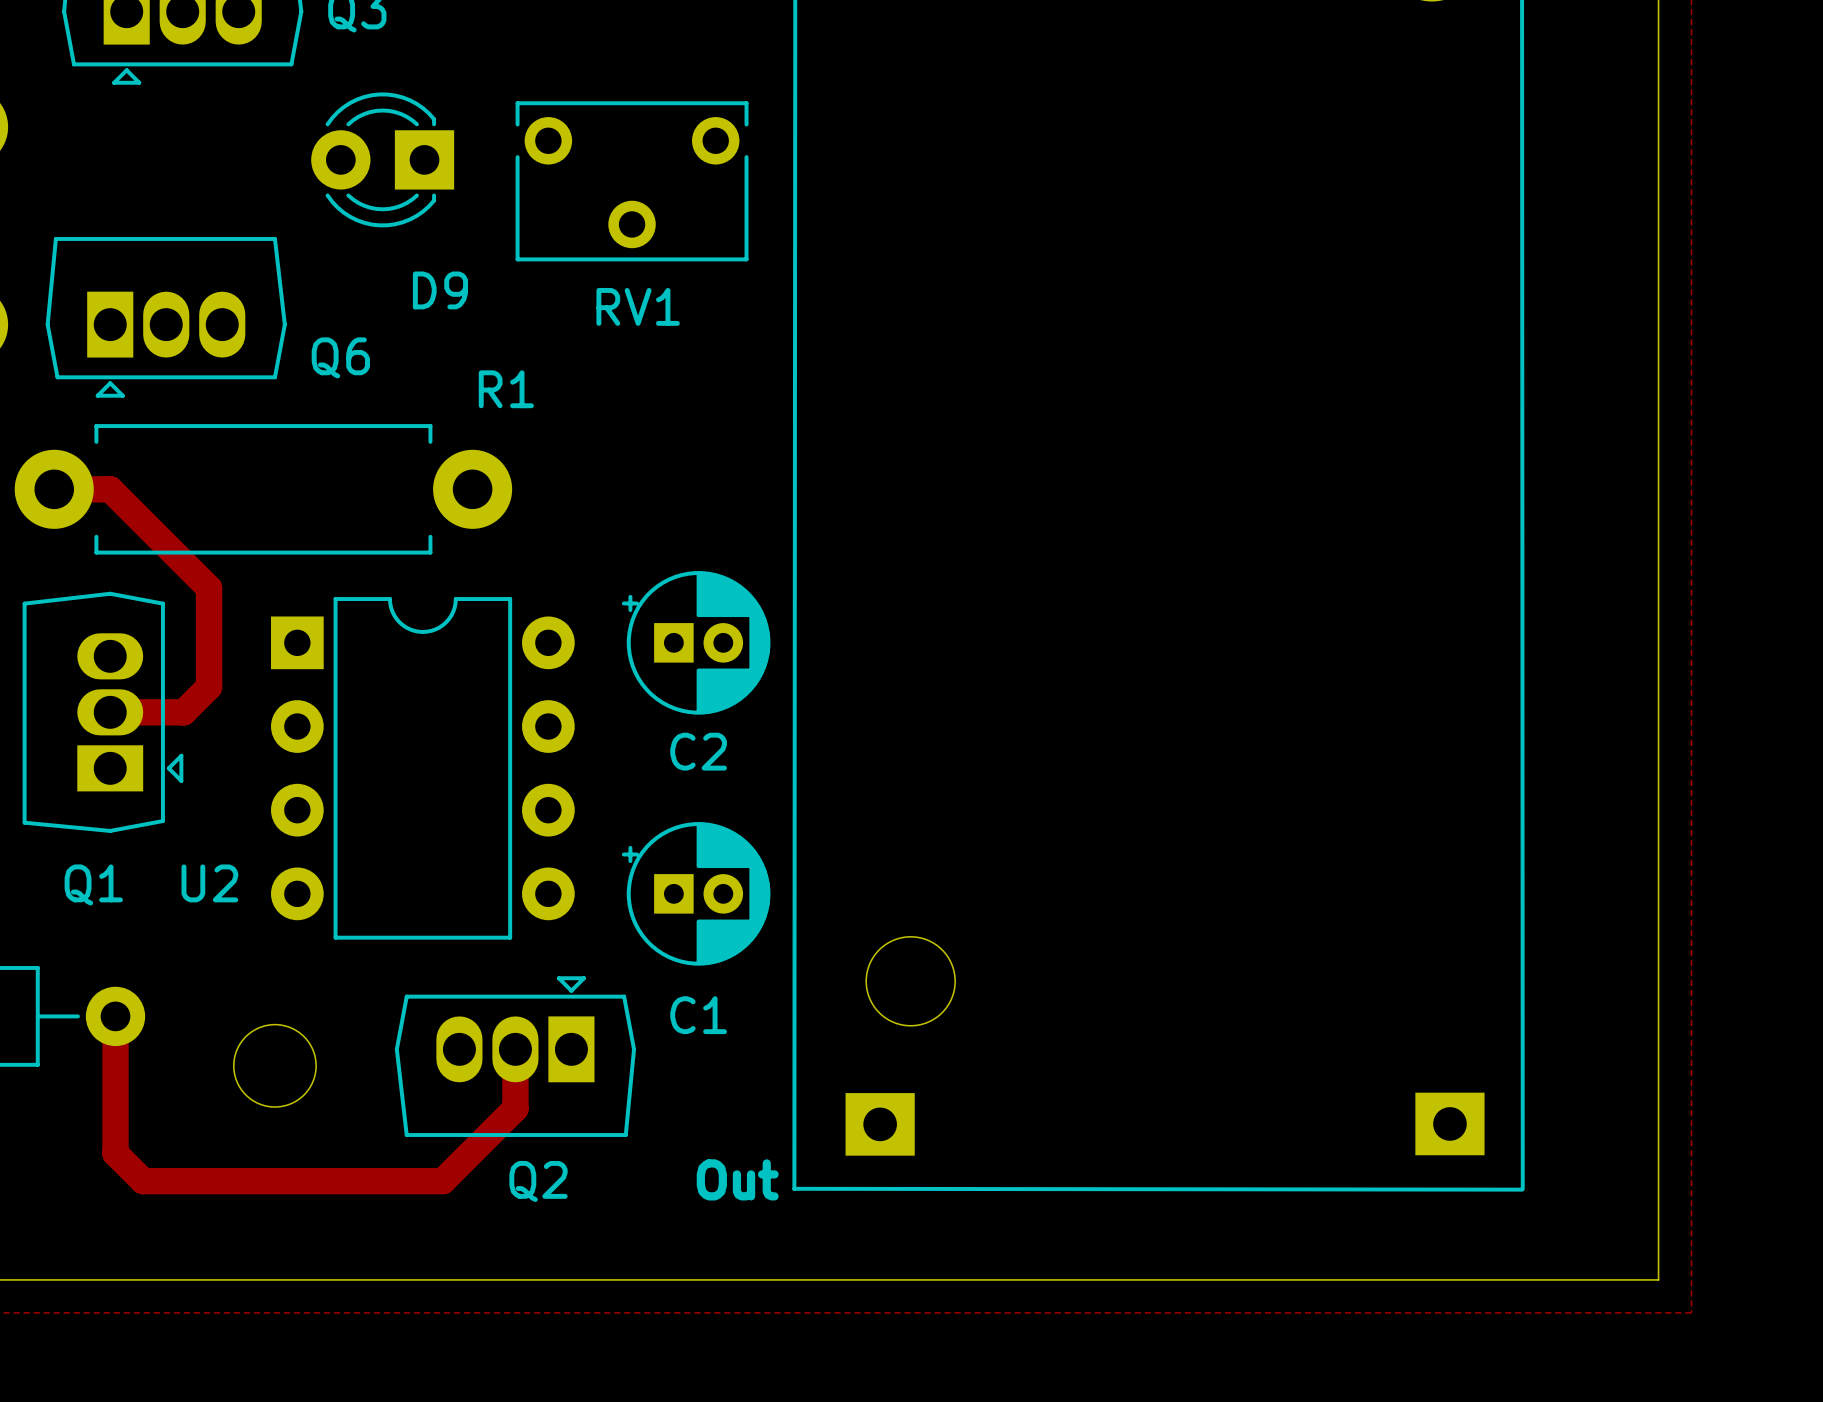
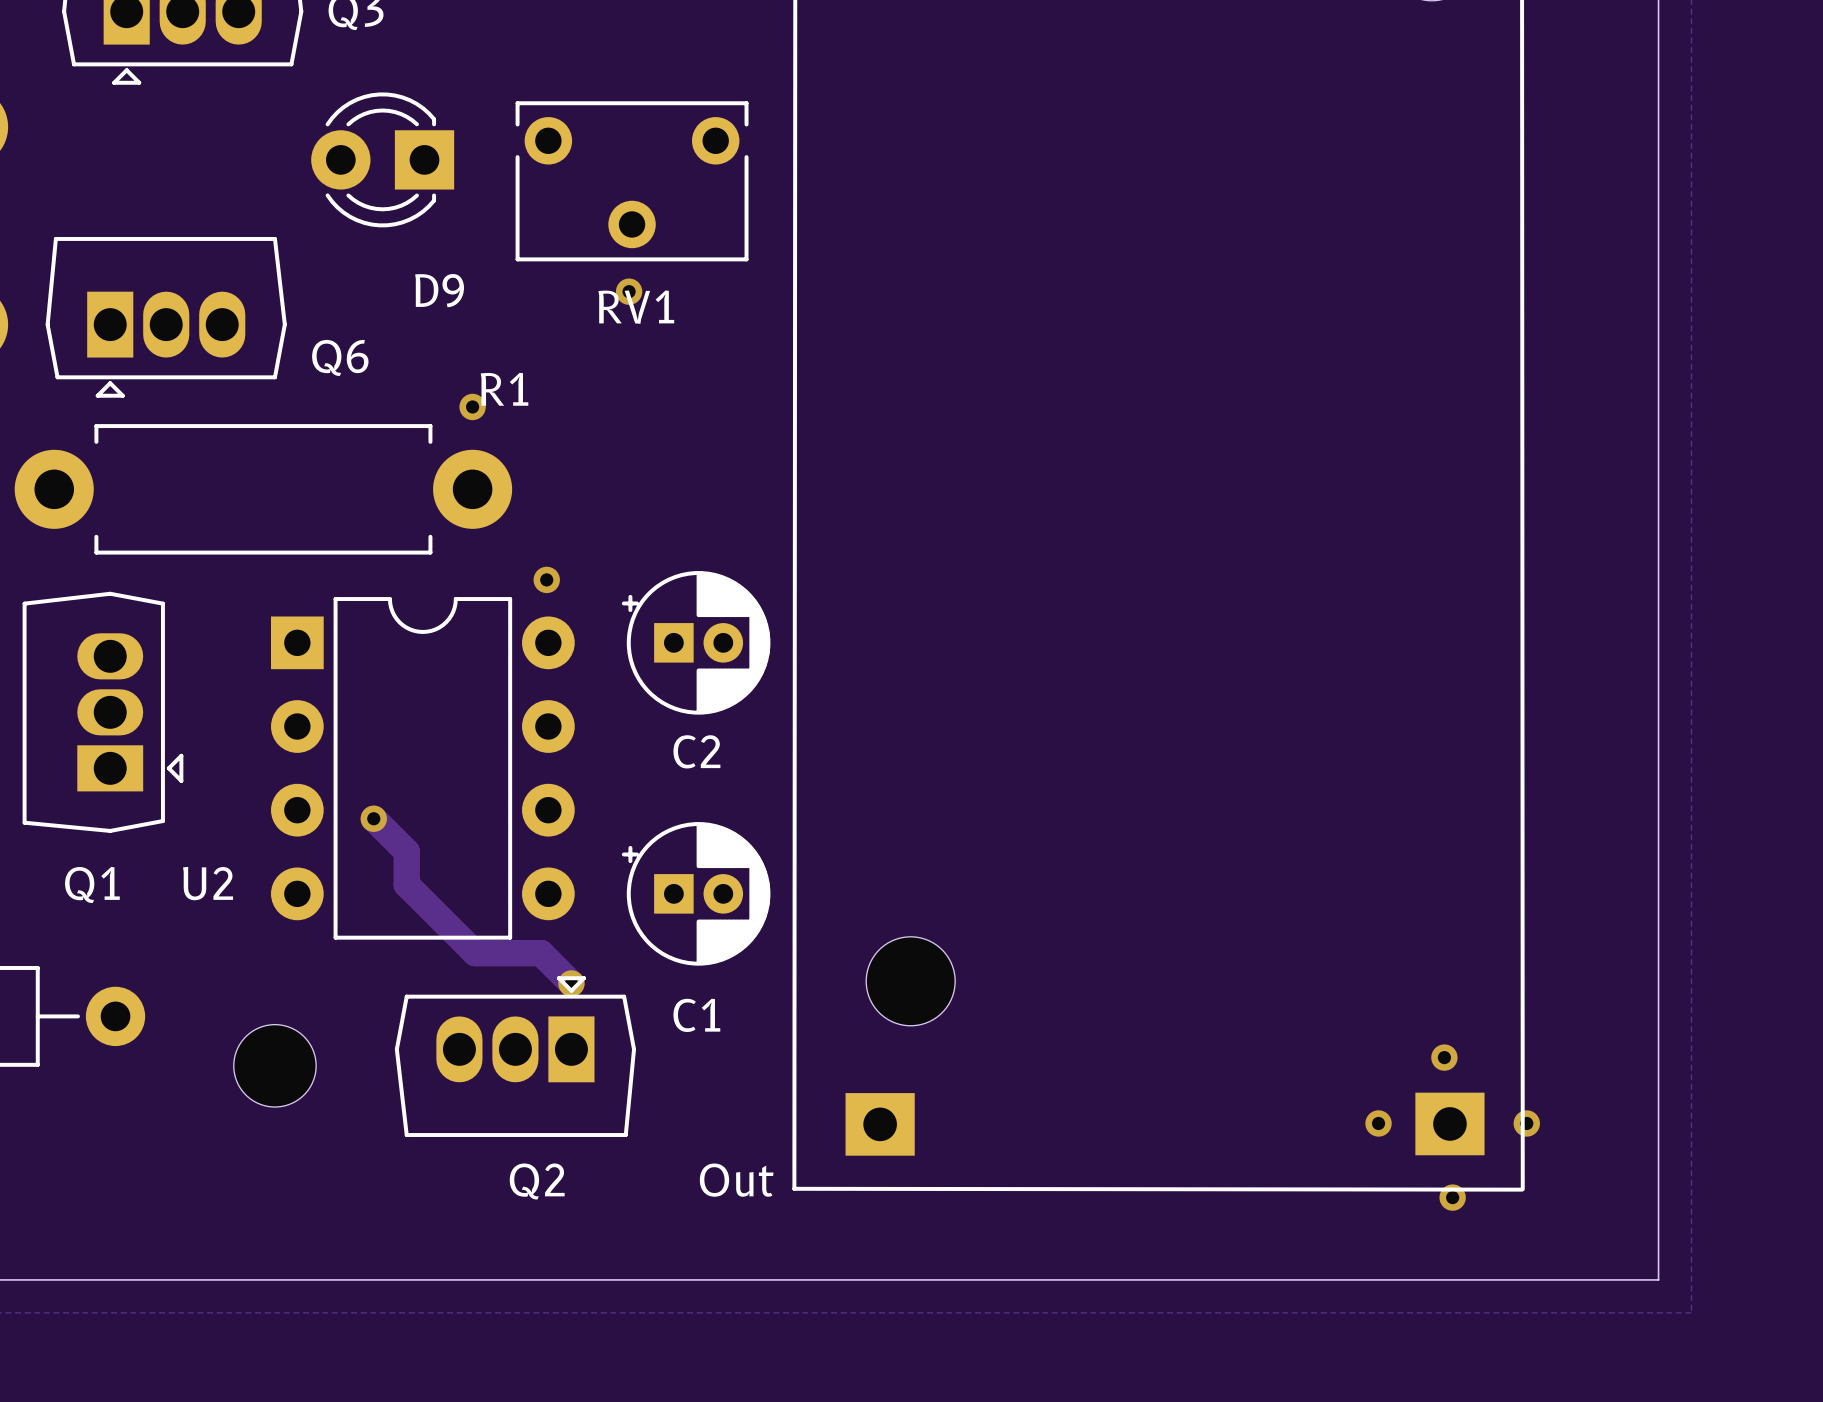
via: none -> (629, 291)
via: none -> (472, 406)
track: (54, 489) (110, 489) (209, 588) (209, 686) (183, 712) (110, 712) -> none
via: none -> (546, 579)
track: none -> (373, 818) (406, 851) (406, 884) (475, 953) (541, 953) (571, 983)
via: none -> (373, 818)
via: none -> (571, 983)
track: (115, 1016) (115, 1153) (143, 1181) (442, 1181) (515, 1108) (515, 1049) -> none
via: none -> (1444, 1057)
via: none -> (1378, 1123)
via: none -> (1526, 1123)
via: none -> (1452, 1197)

